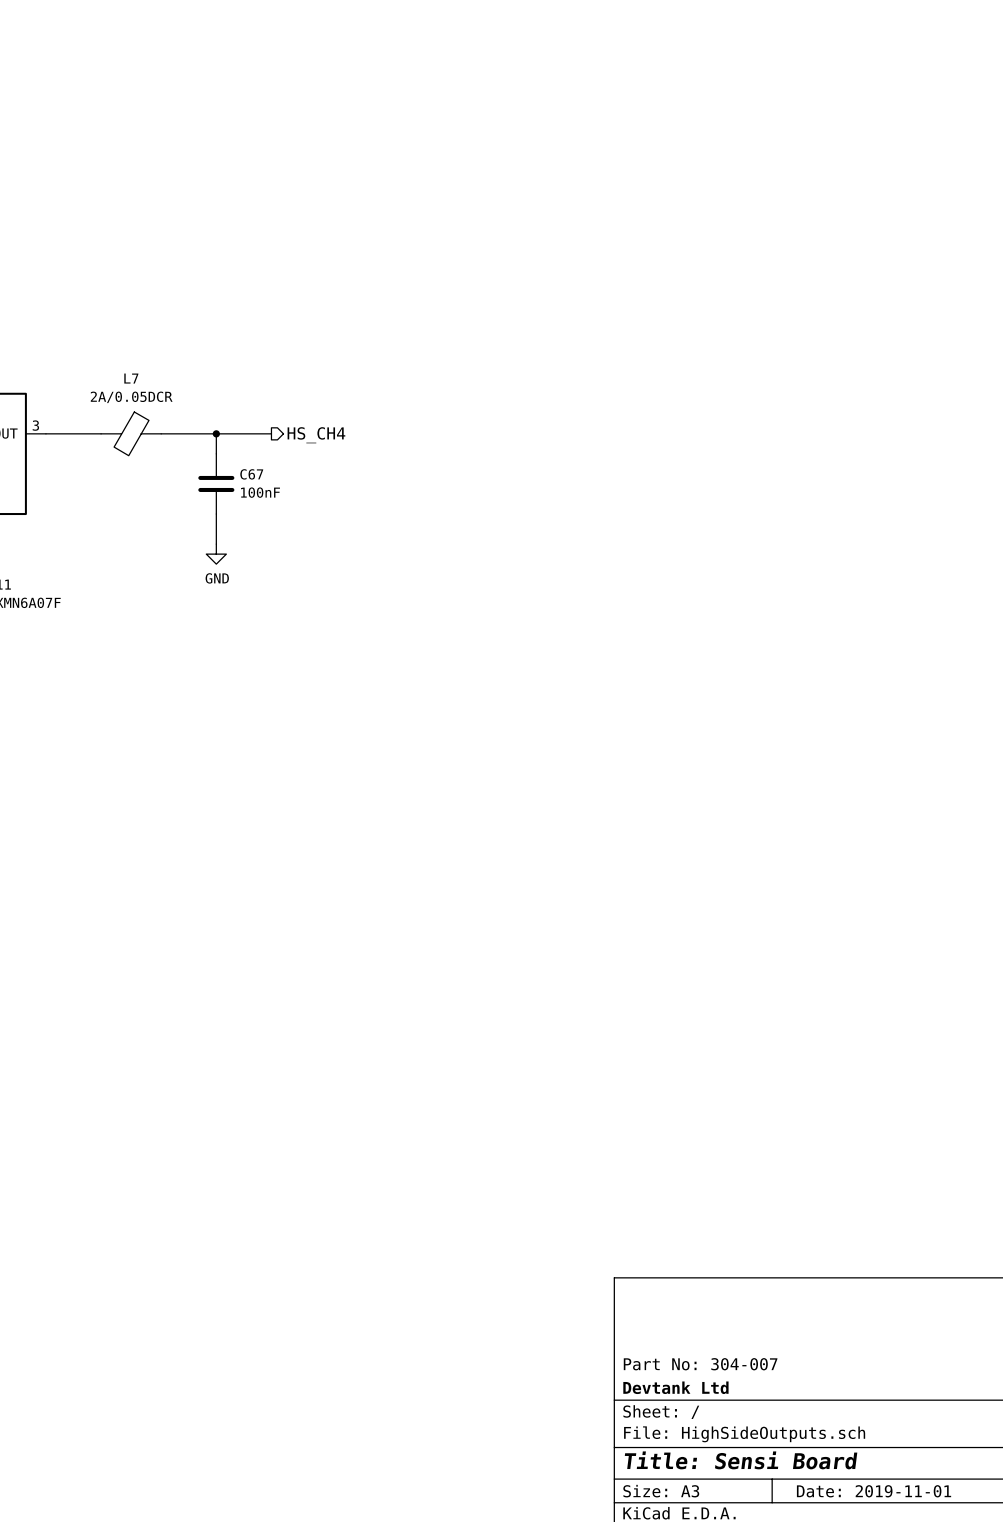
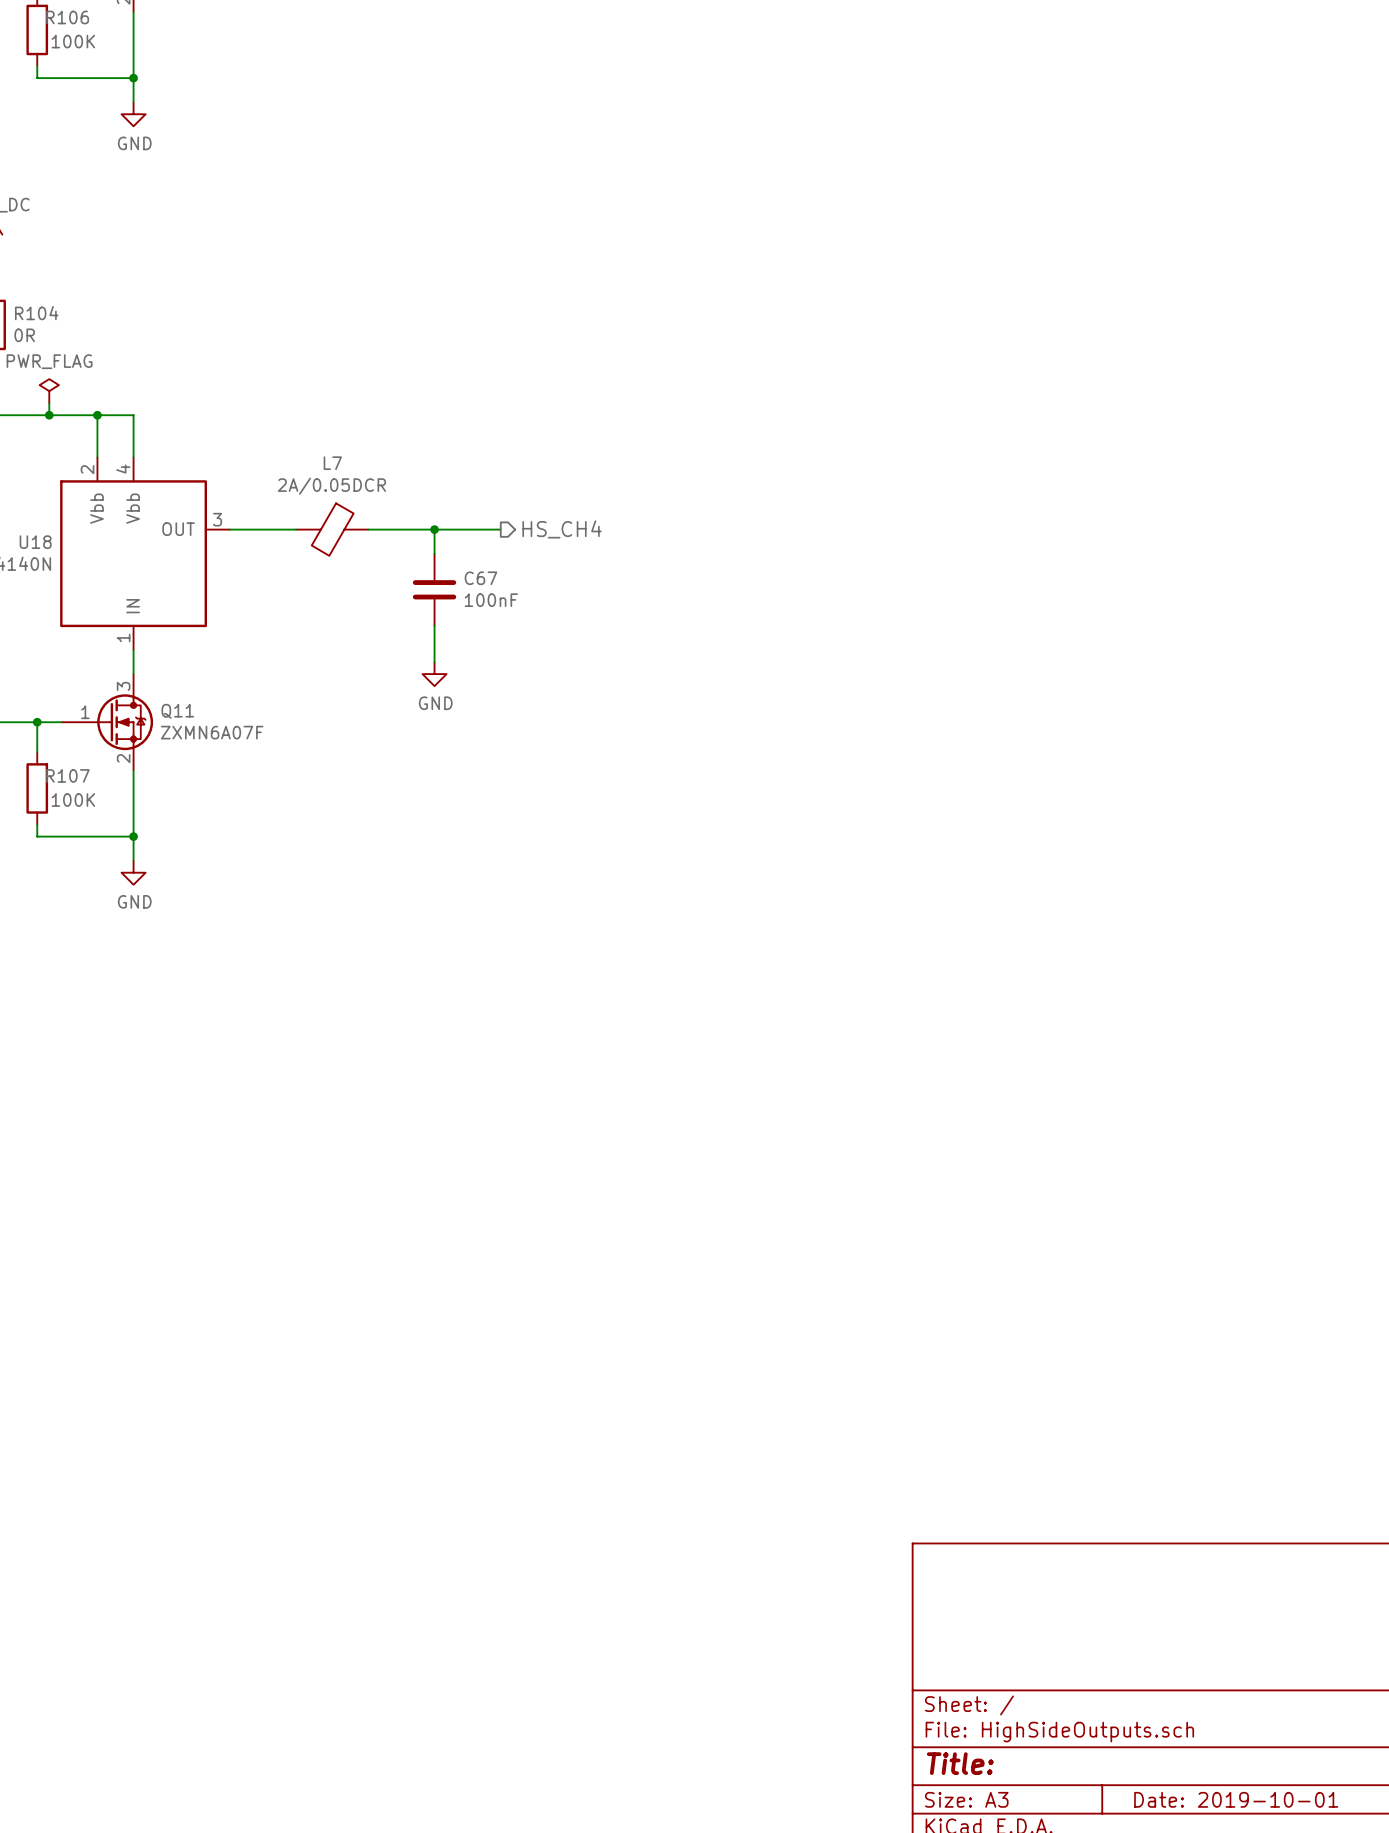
title block: Part No: 304-007 (700, 1364) -> none
title block: Devtank Ltd (675, 1387) -> none
title block: Title: Sensi Board (741, 1460) -> Title: (960, 1763)
title block: Date: 2019-11-01 (874, 1491) -> Date: 2019-10-01 (1236, 1799)

